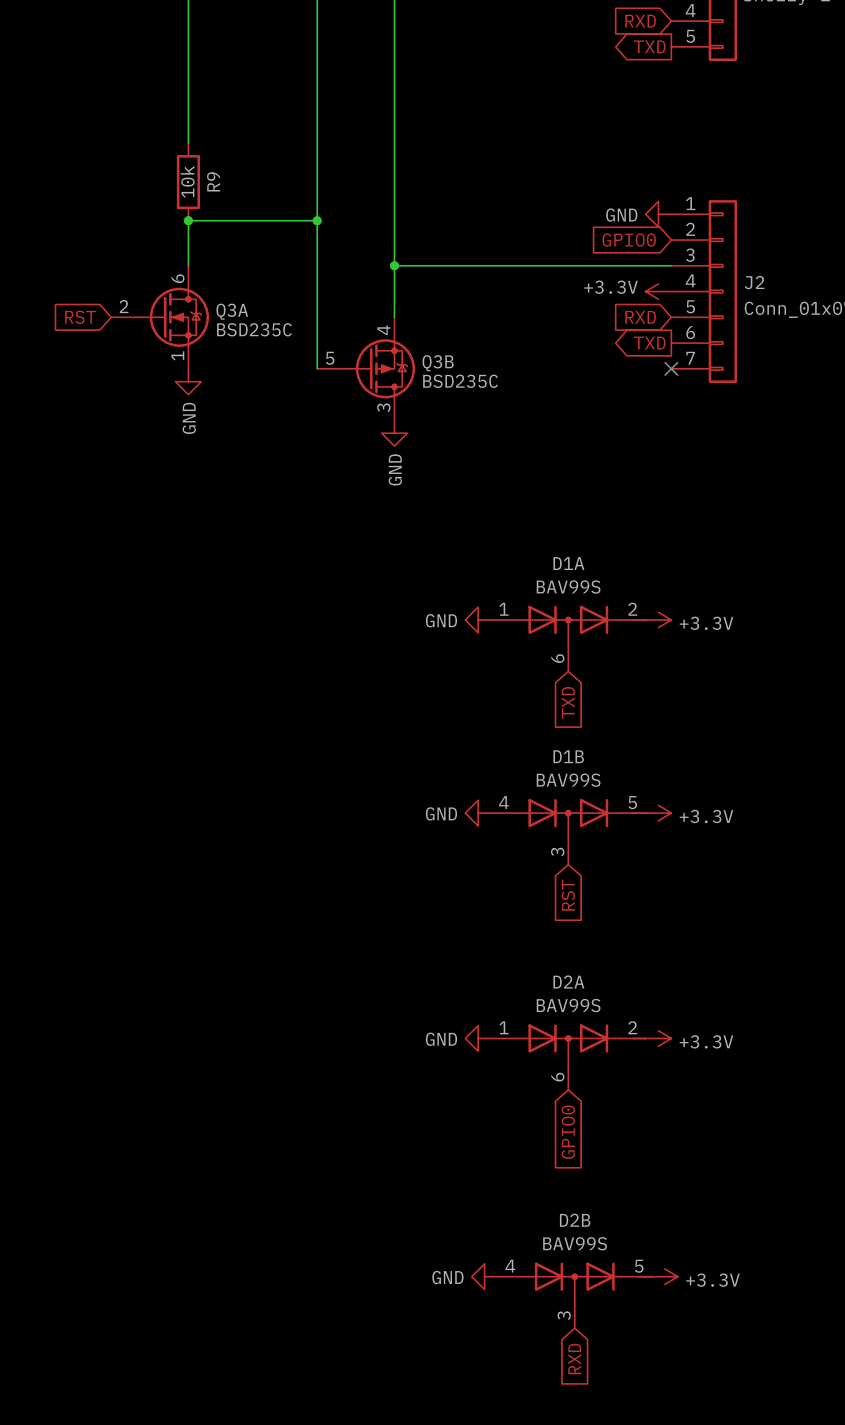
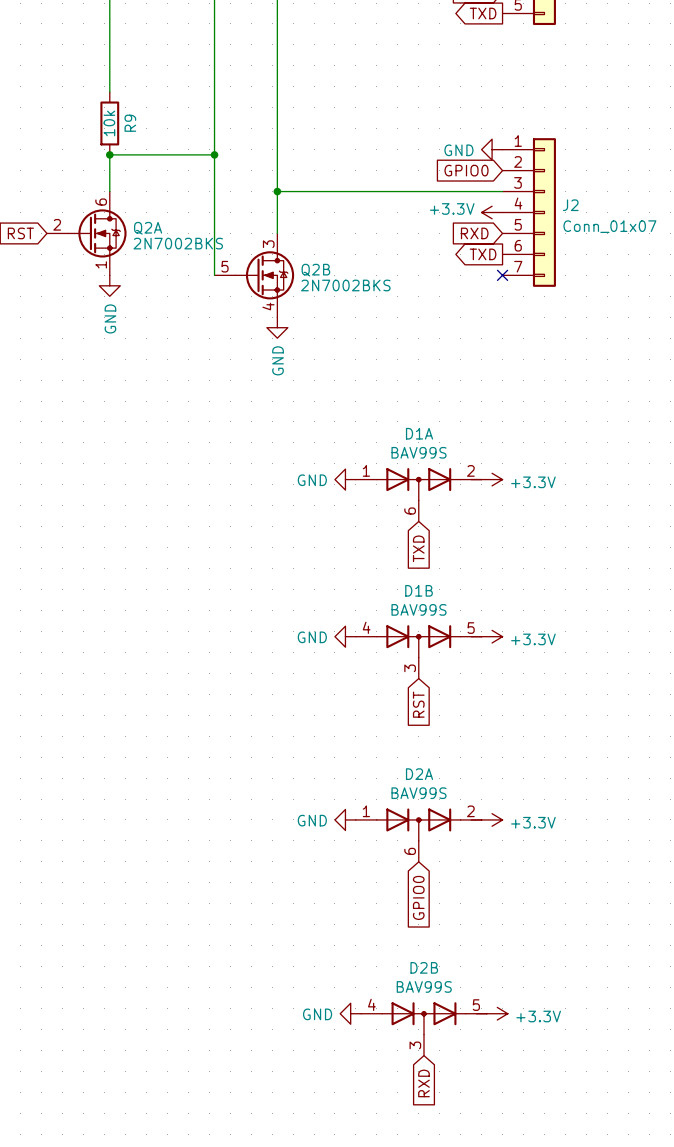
Q3A: BSD235C (160, 317) -> none
Q2A: none -> 2N7002BKS (86, 233)
Q3B: BSD235C (366, 368) -> none
Q2B: none -> 2N7002BKS (254, 275)

